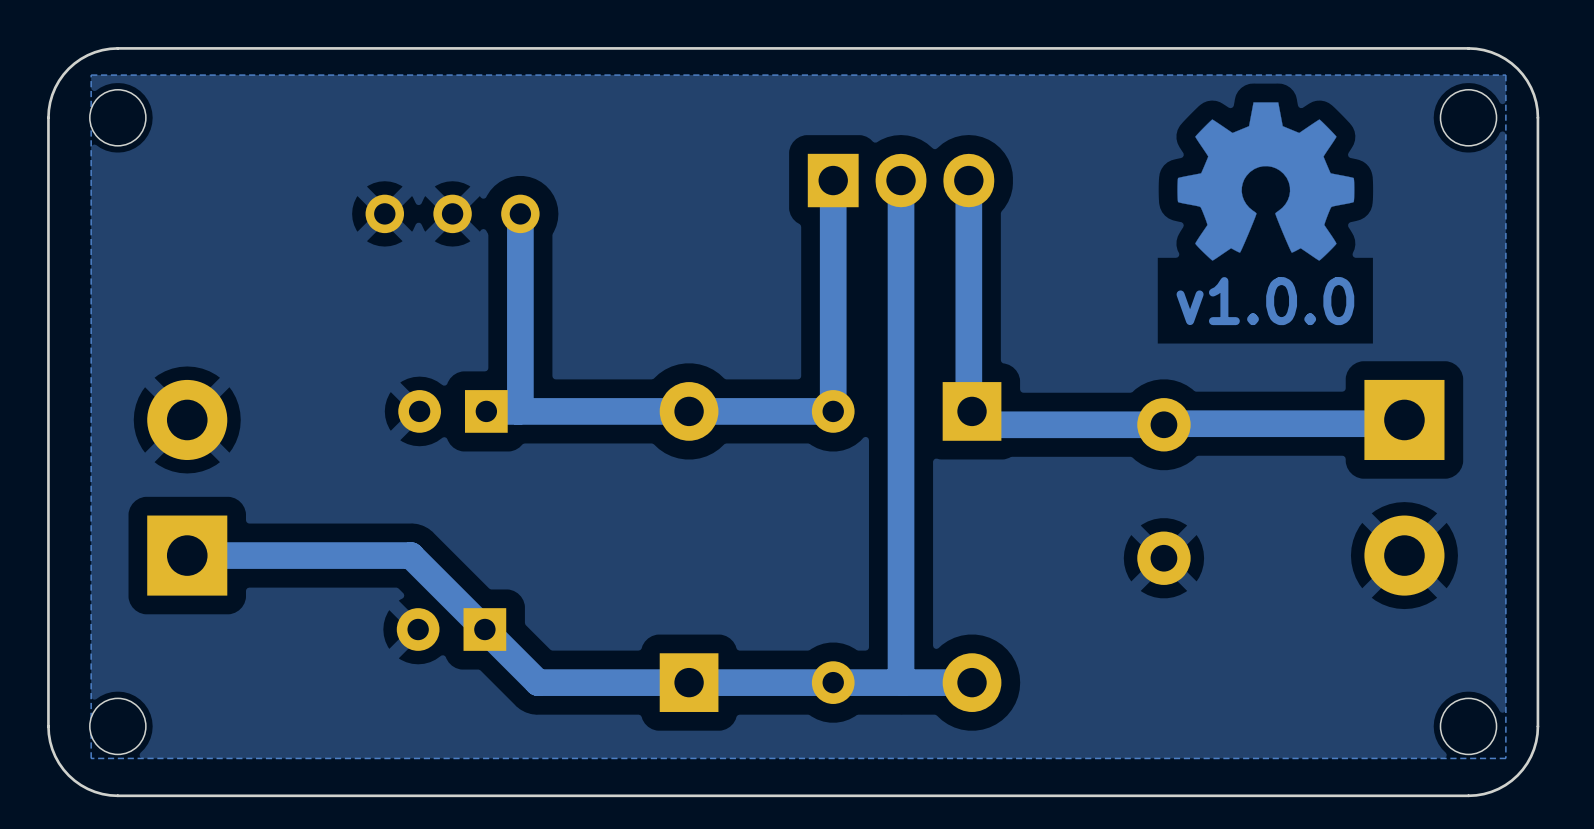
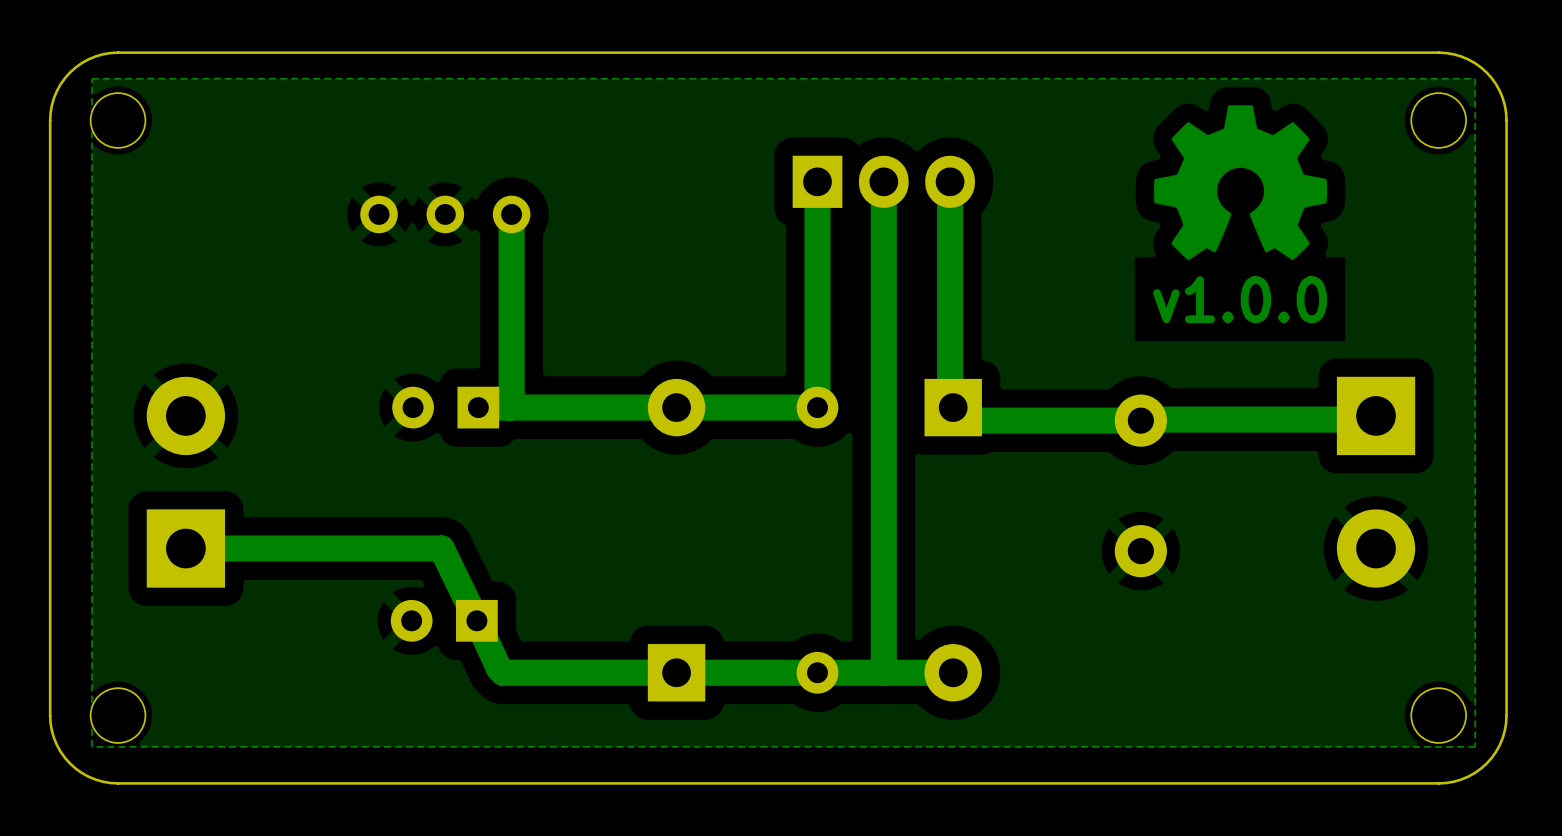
track: (410, 555) (538, 682) -> (404, 548) (441, 548) (499, 668) (503, 672) (528, 672)

